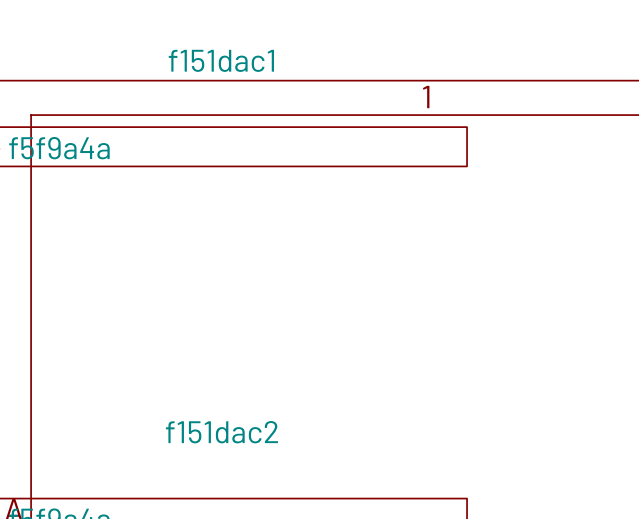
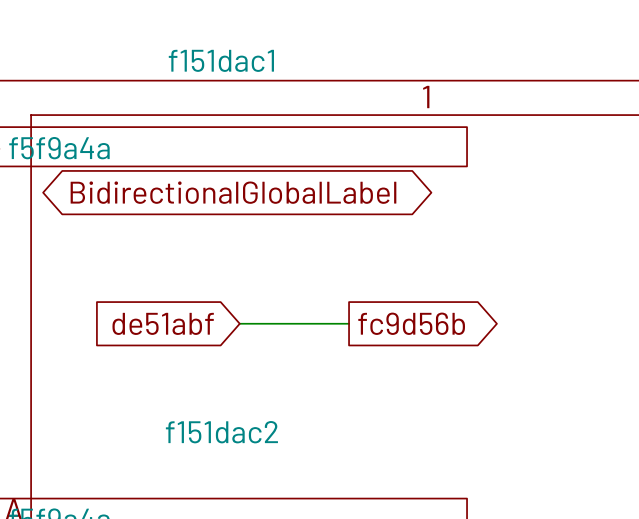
global label: none -> BidirectionalGlobalLabel (233, 192)
global label: none -> de51abf (163, 323)
wire: none -> (239, 323) (349, 323)
global label: none -> fc9d56b (411, 323)

